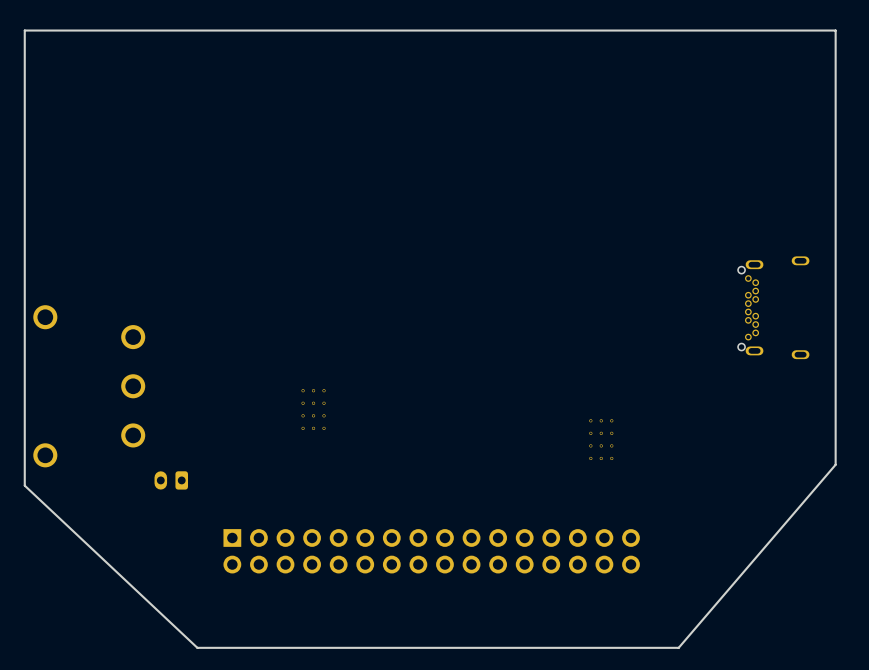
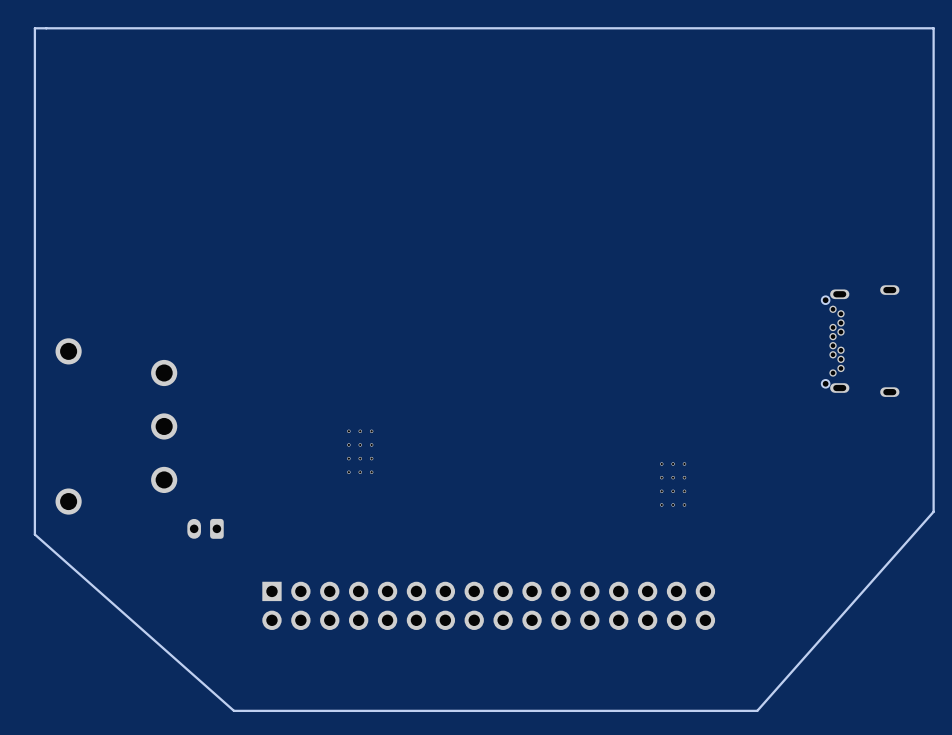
board edge: (678, 647) (835, 464) (835, 30) (24, 30) (24, 485) (197, 647) -> (757, 710) (933, 511) (933, 28) (34, 28) (34, 534) (233, 710)

